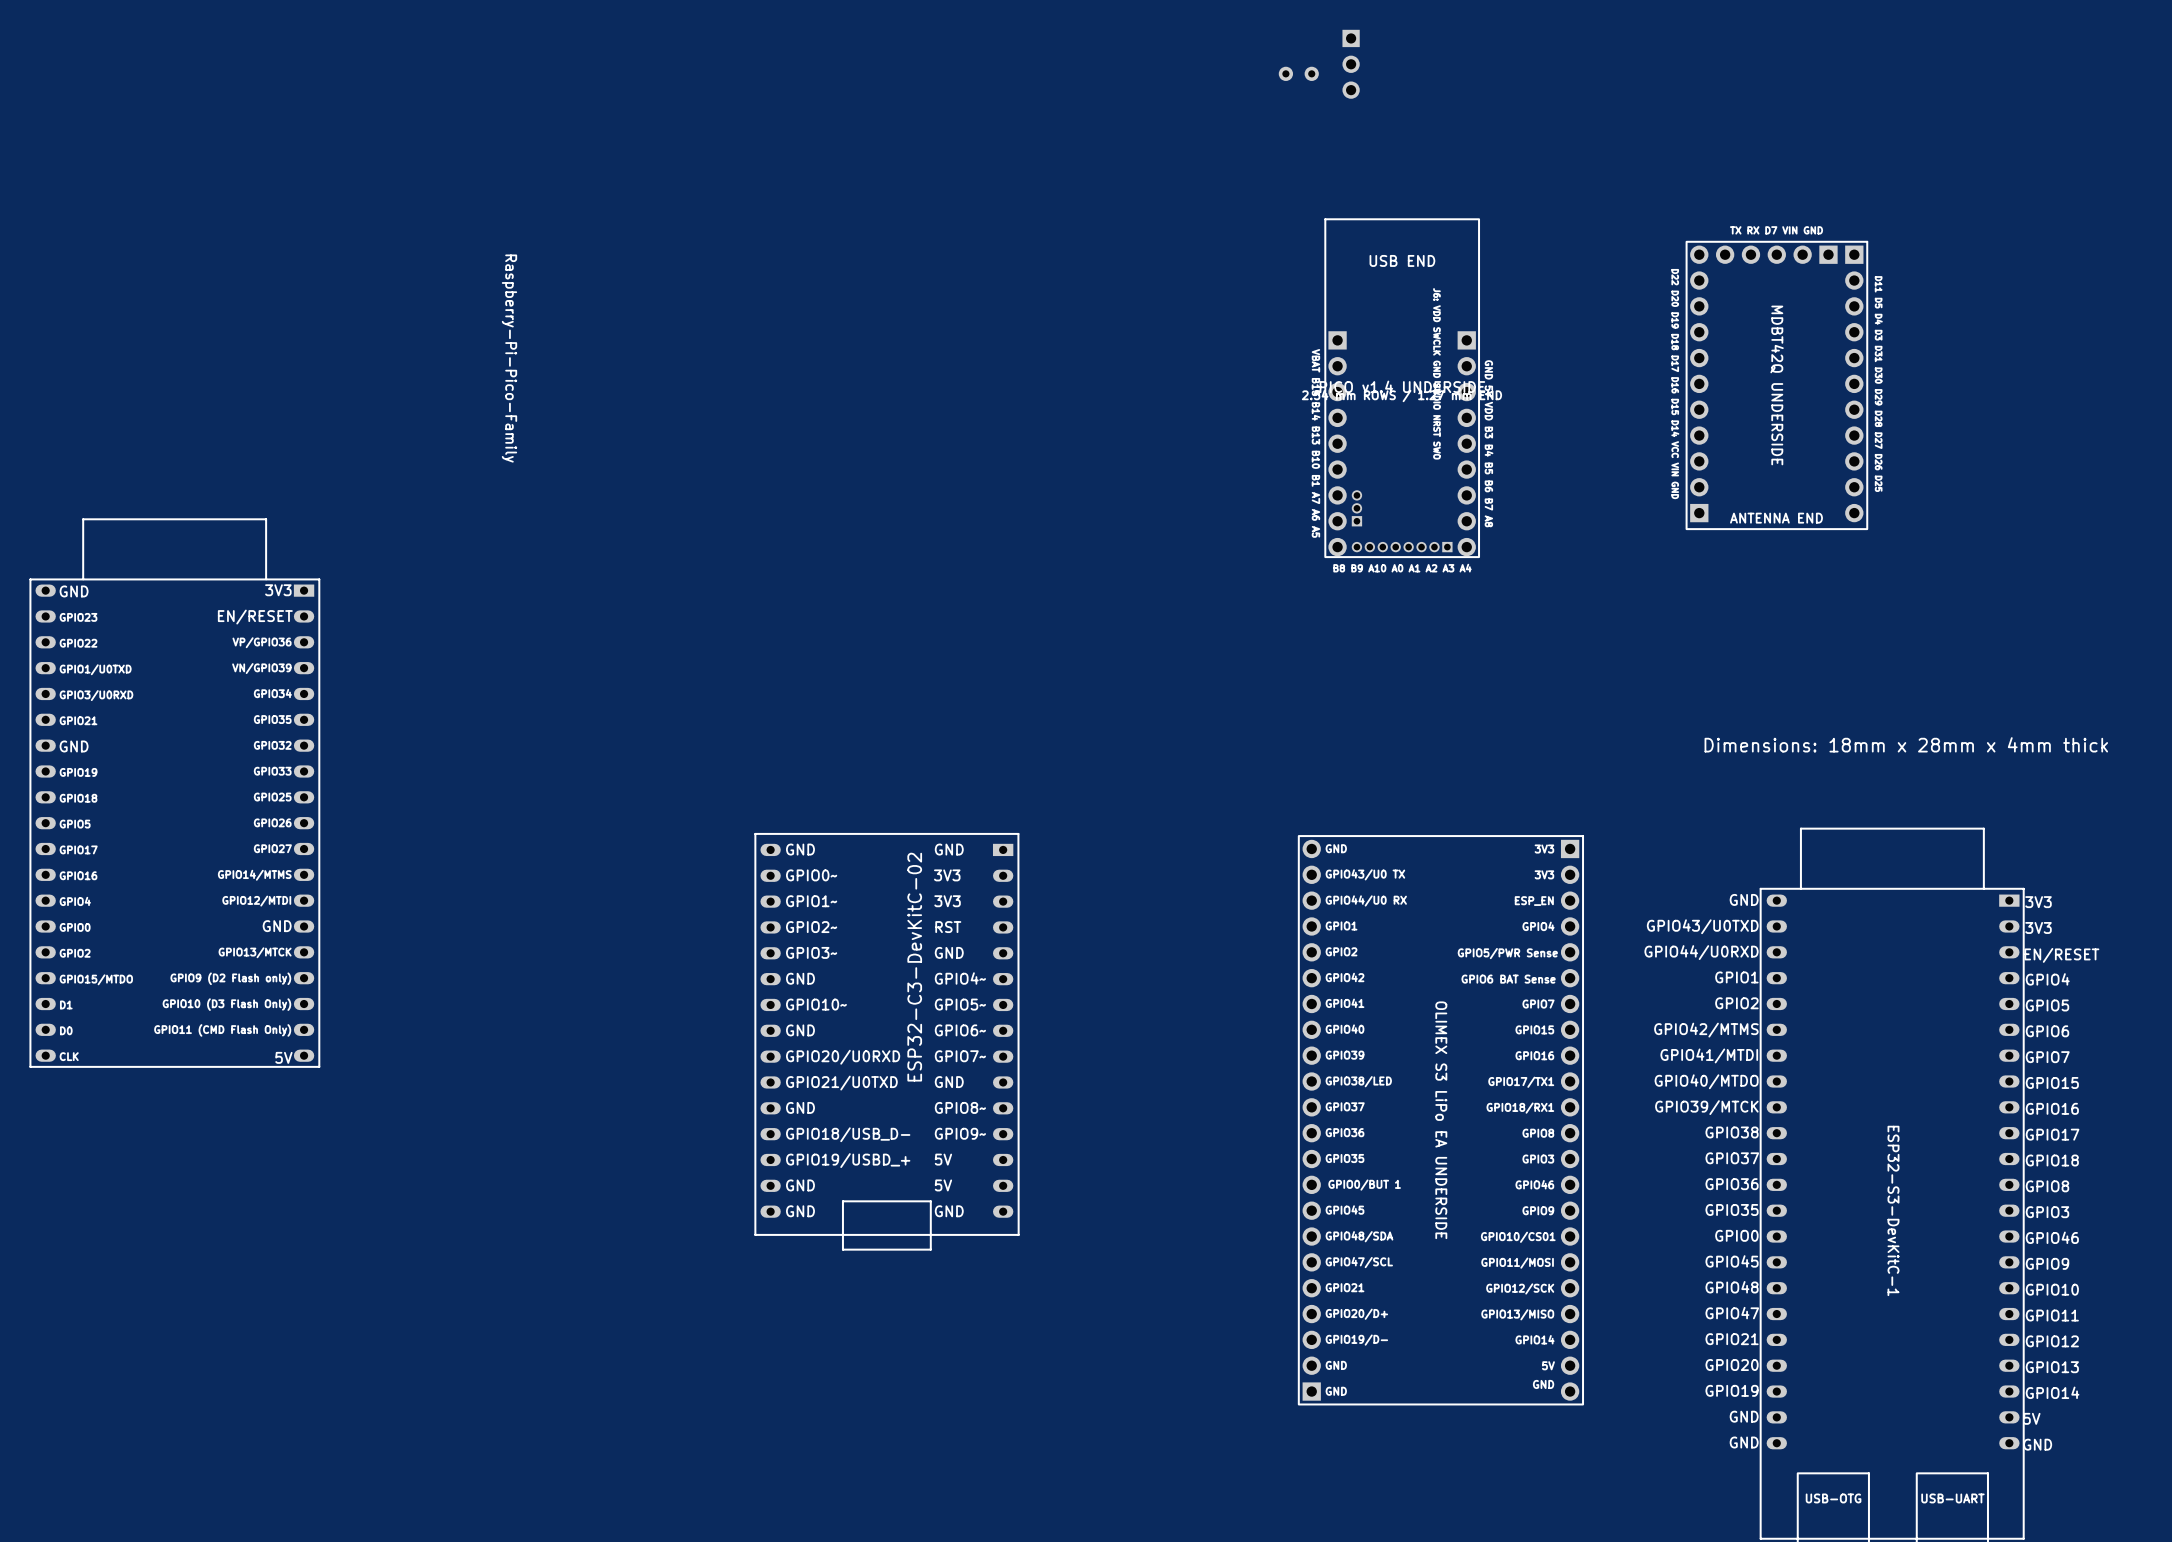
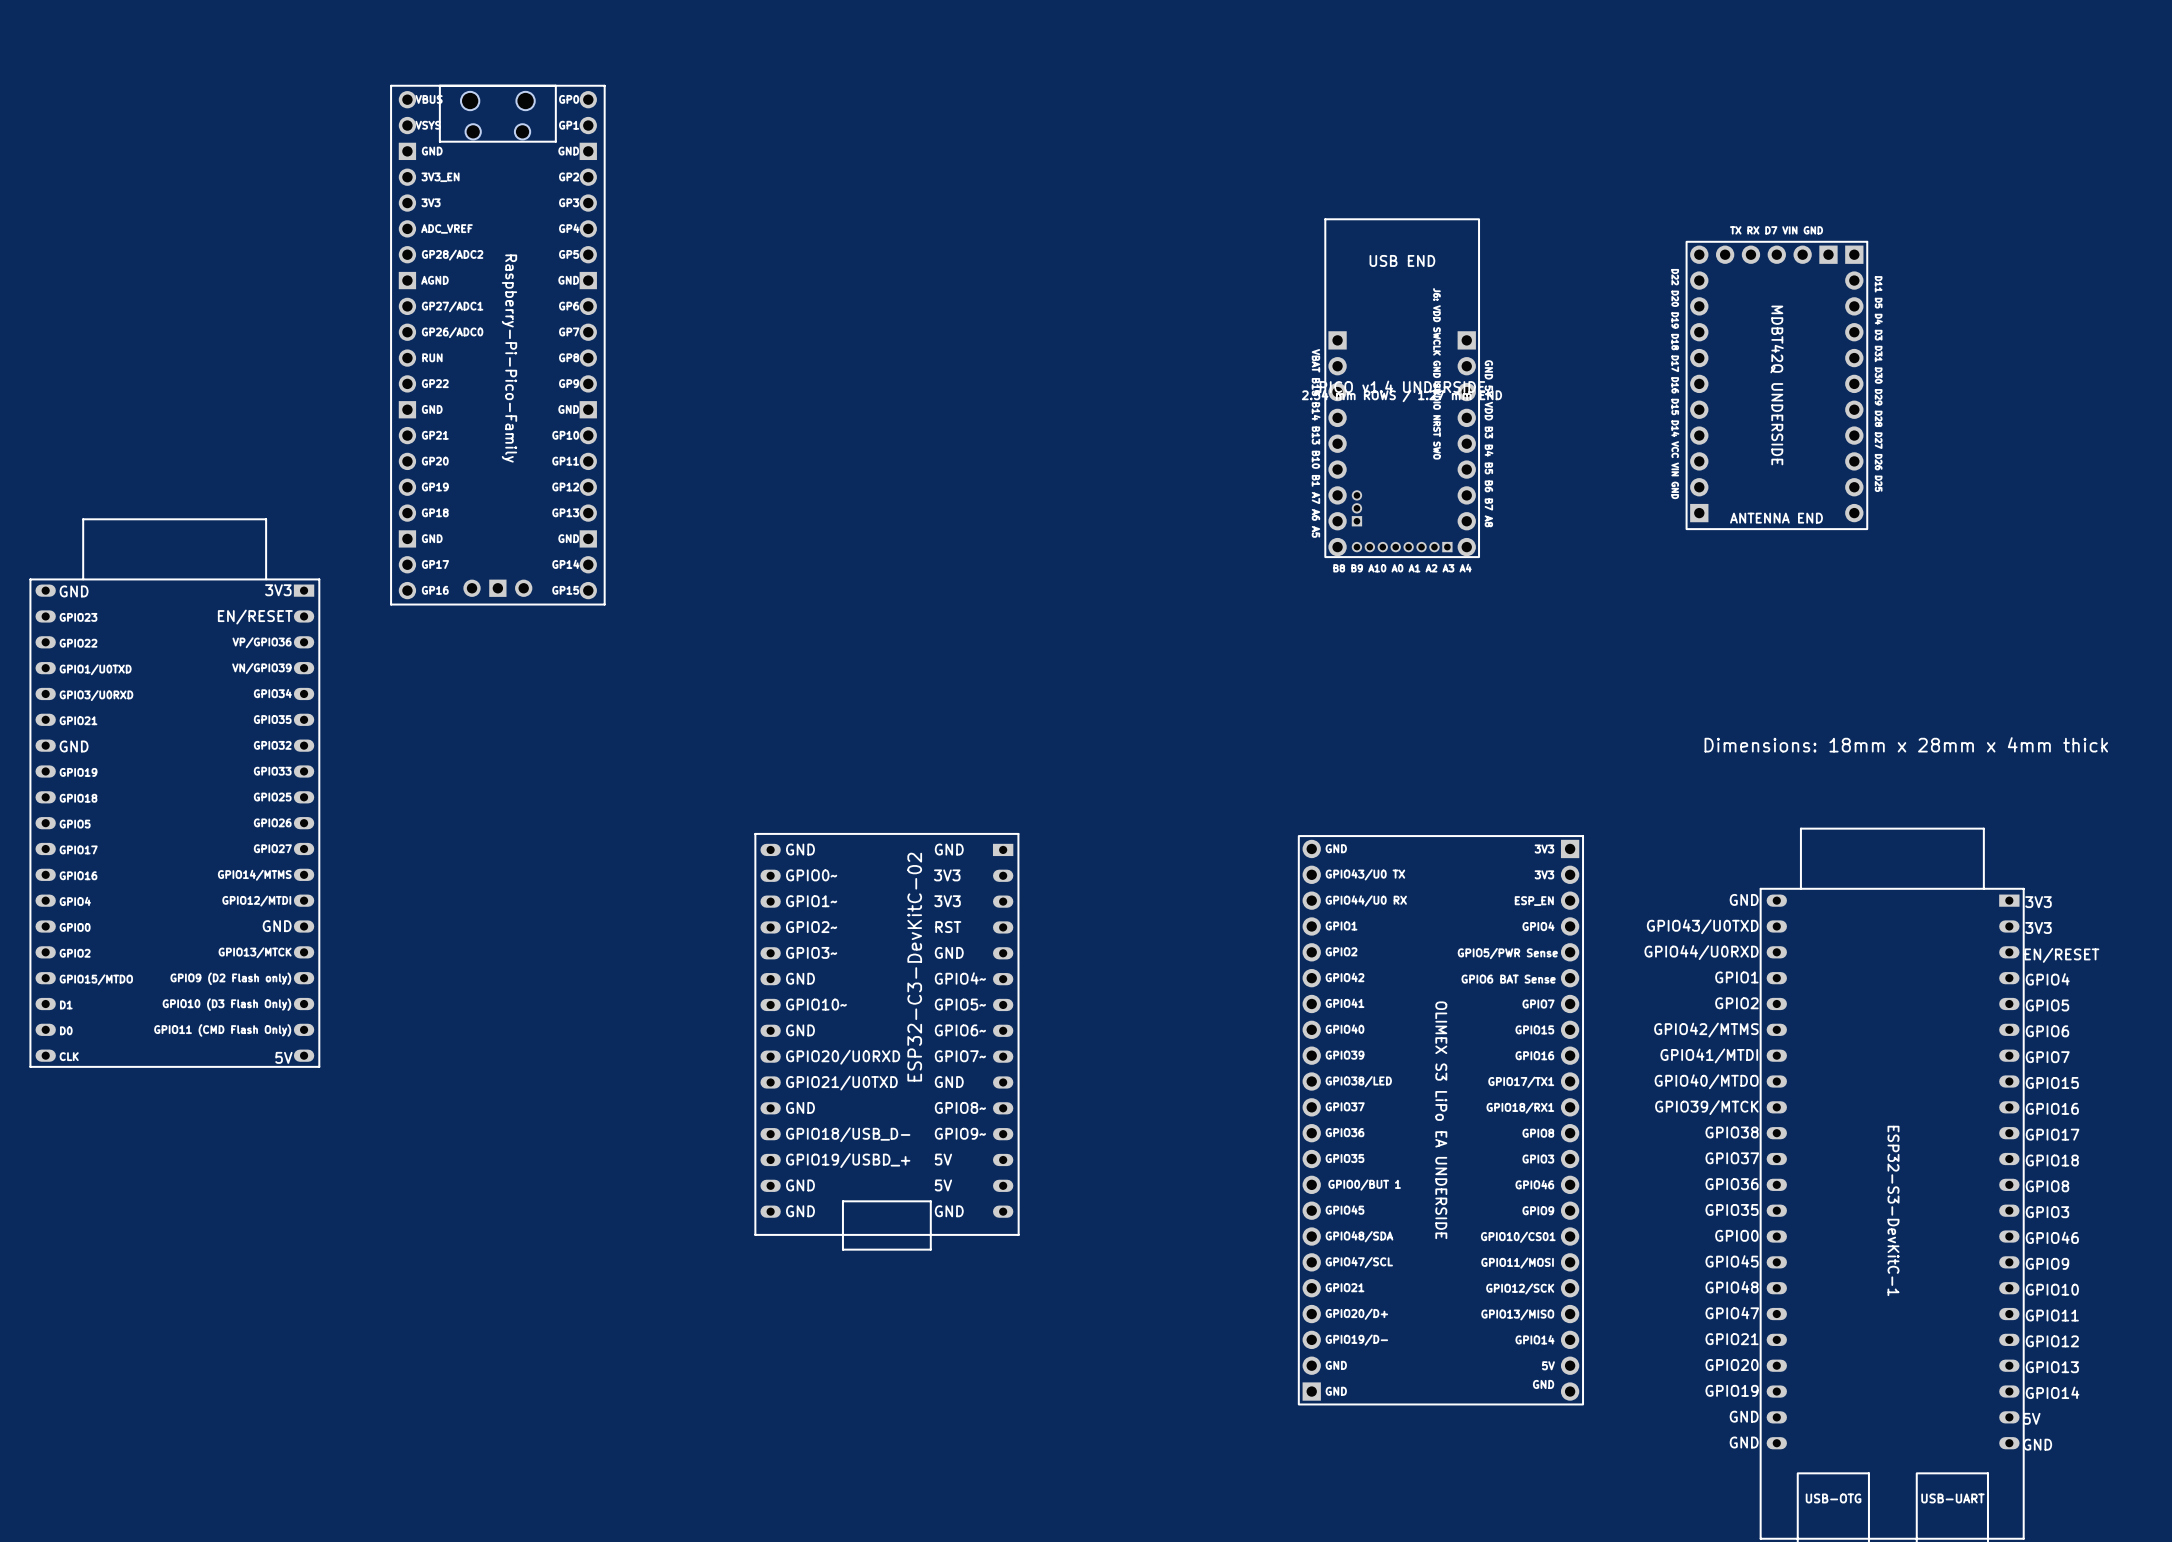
part: (1351, 64) -> none
part: (1298, 73) -> none
part: none -> (497, 345)

